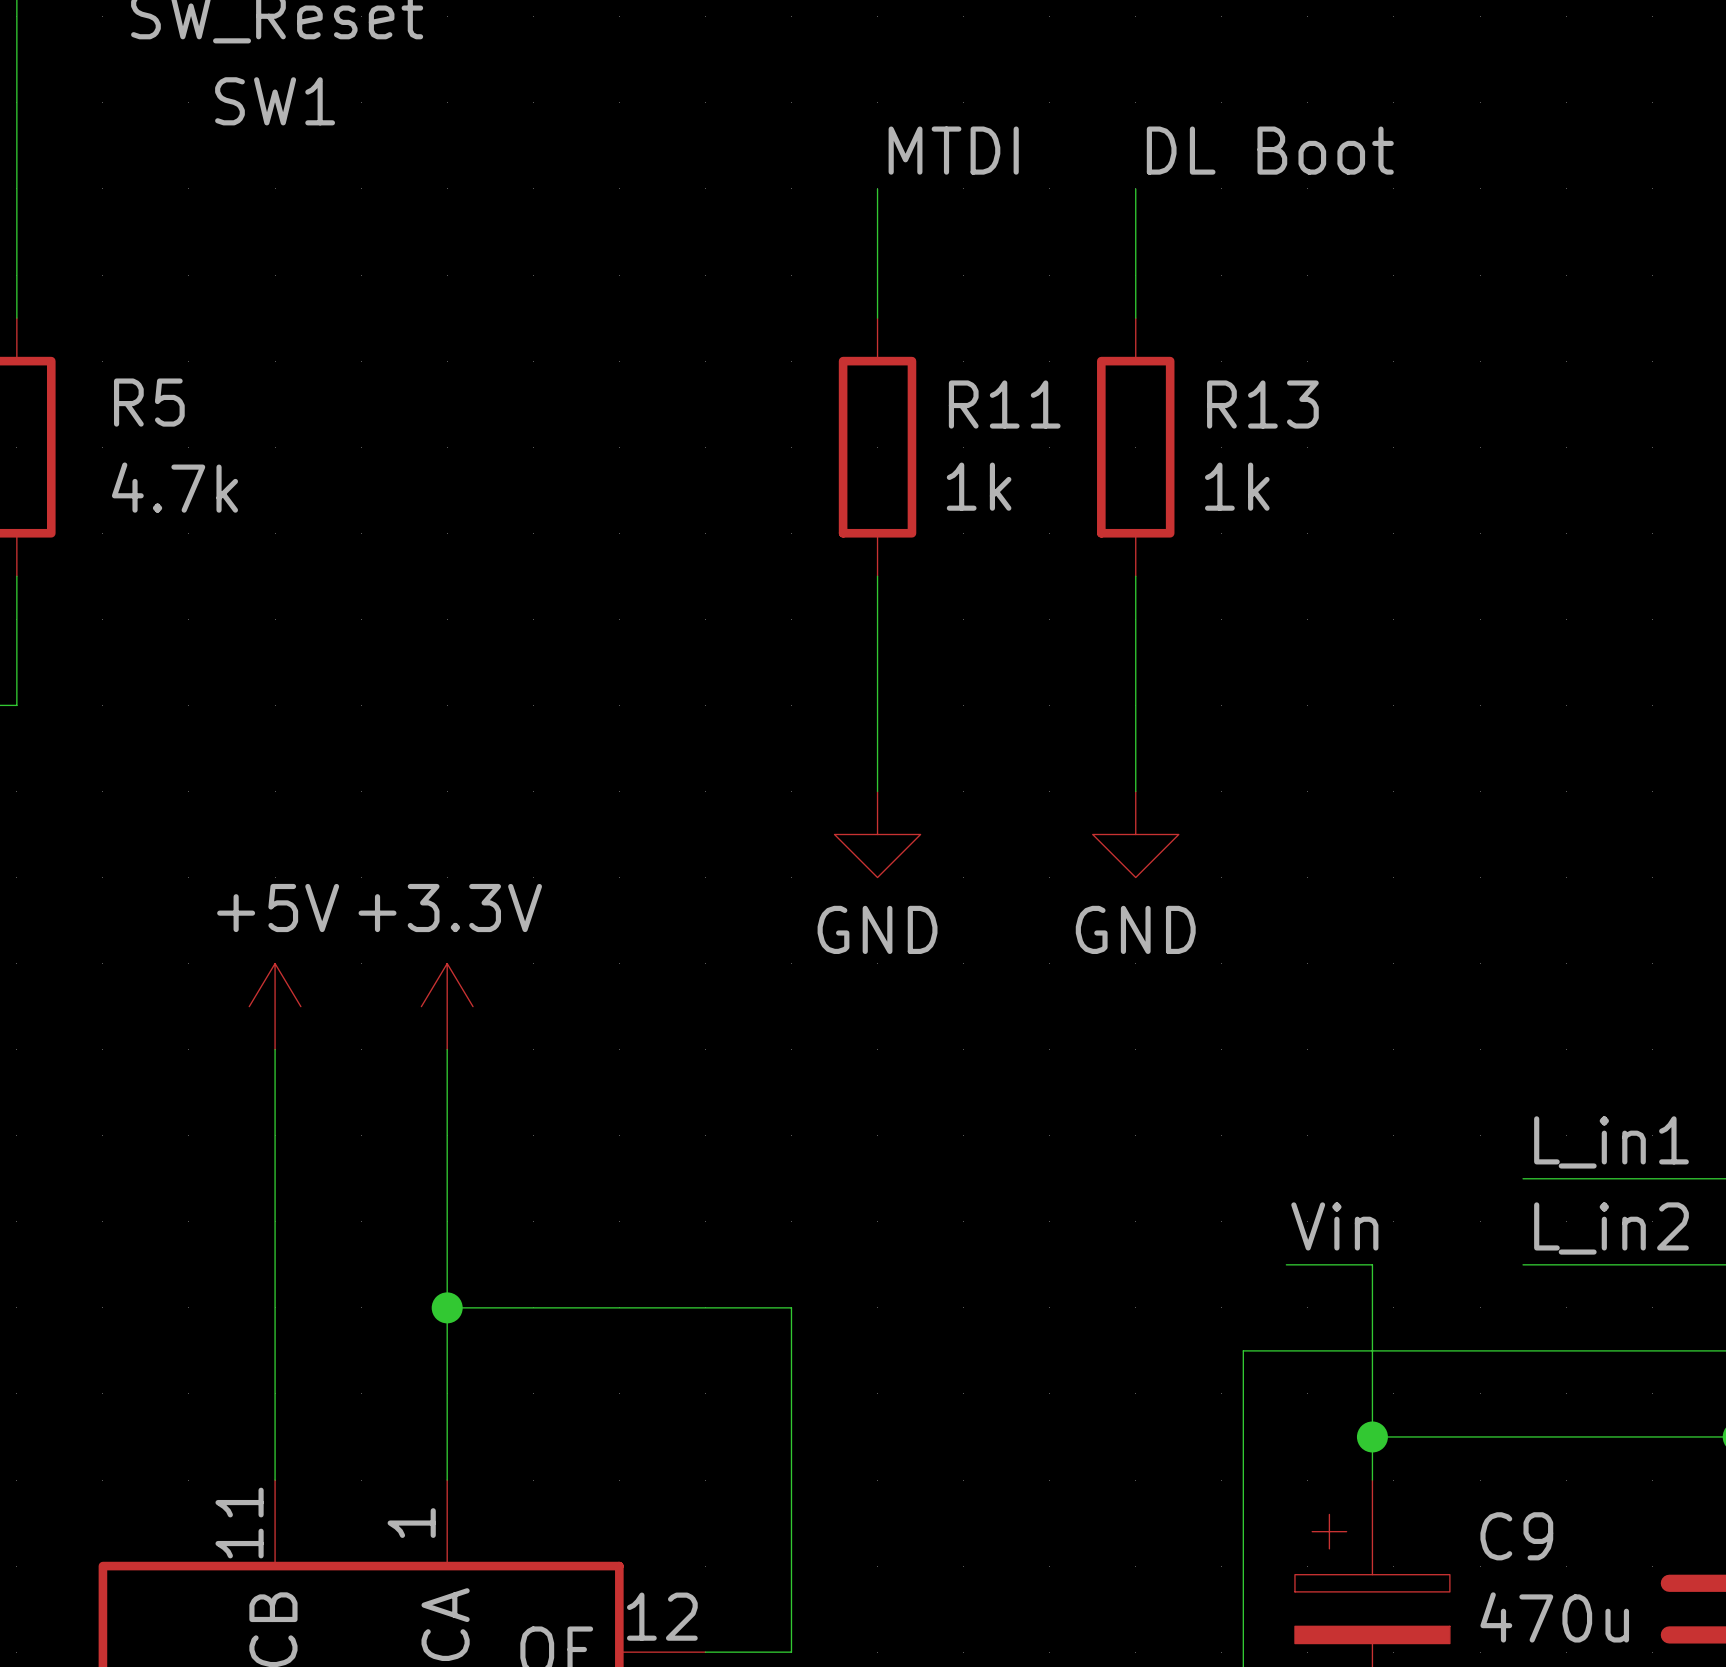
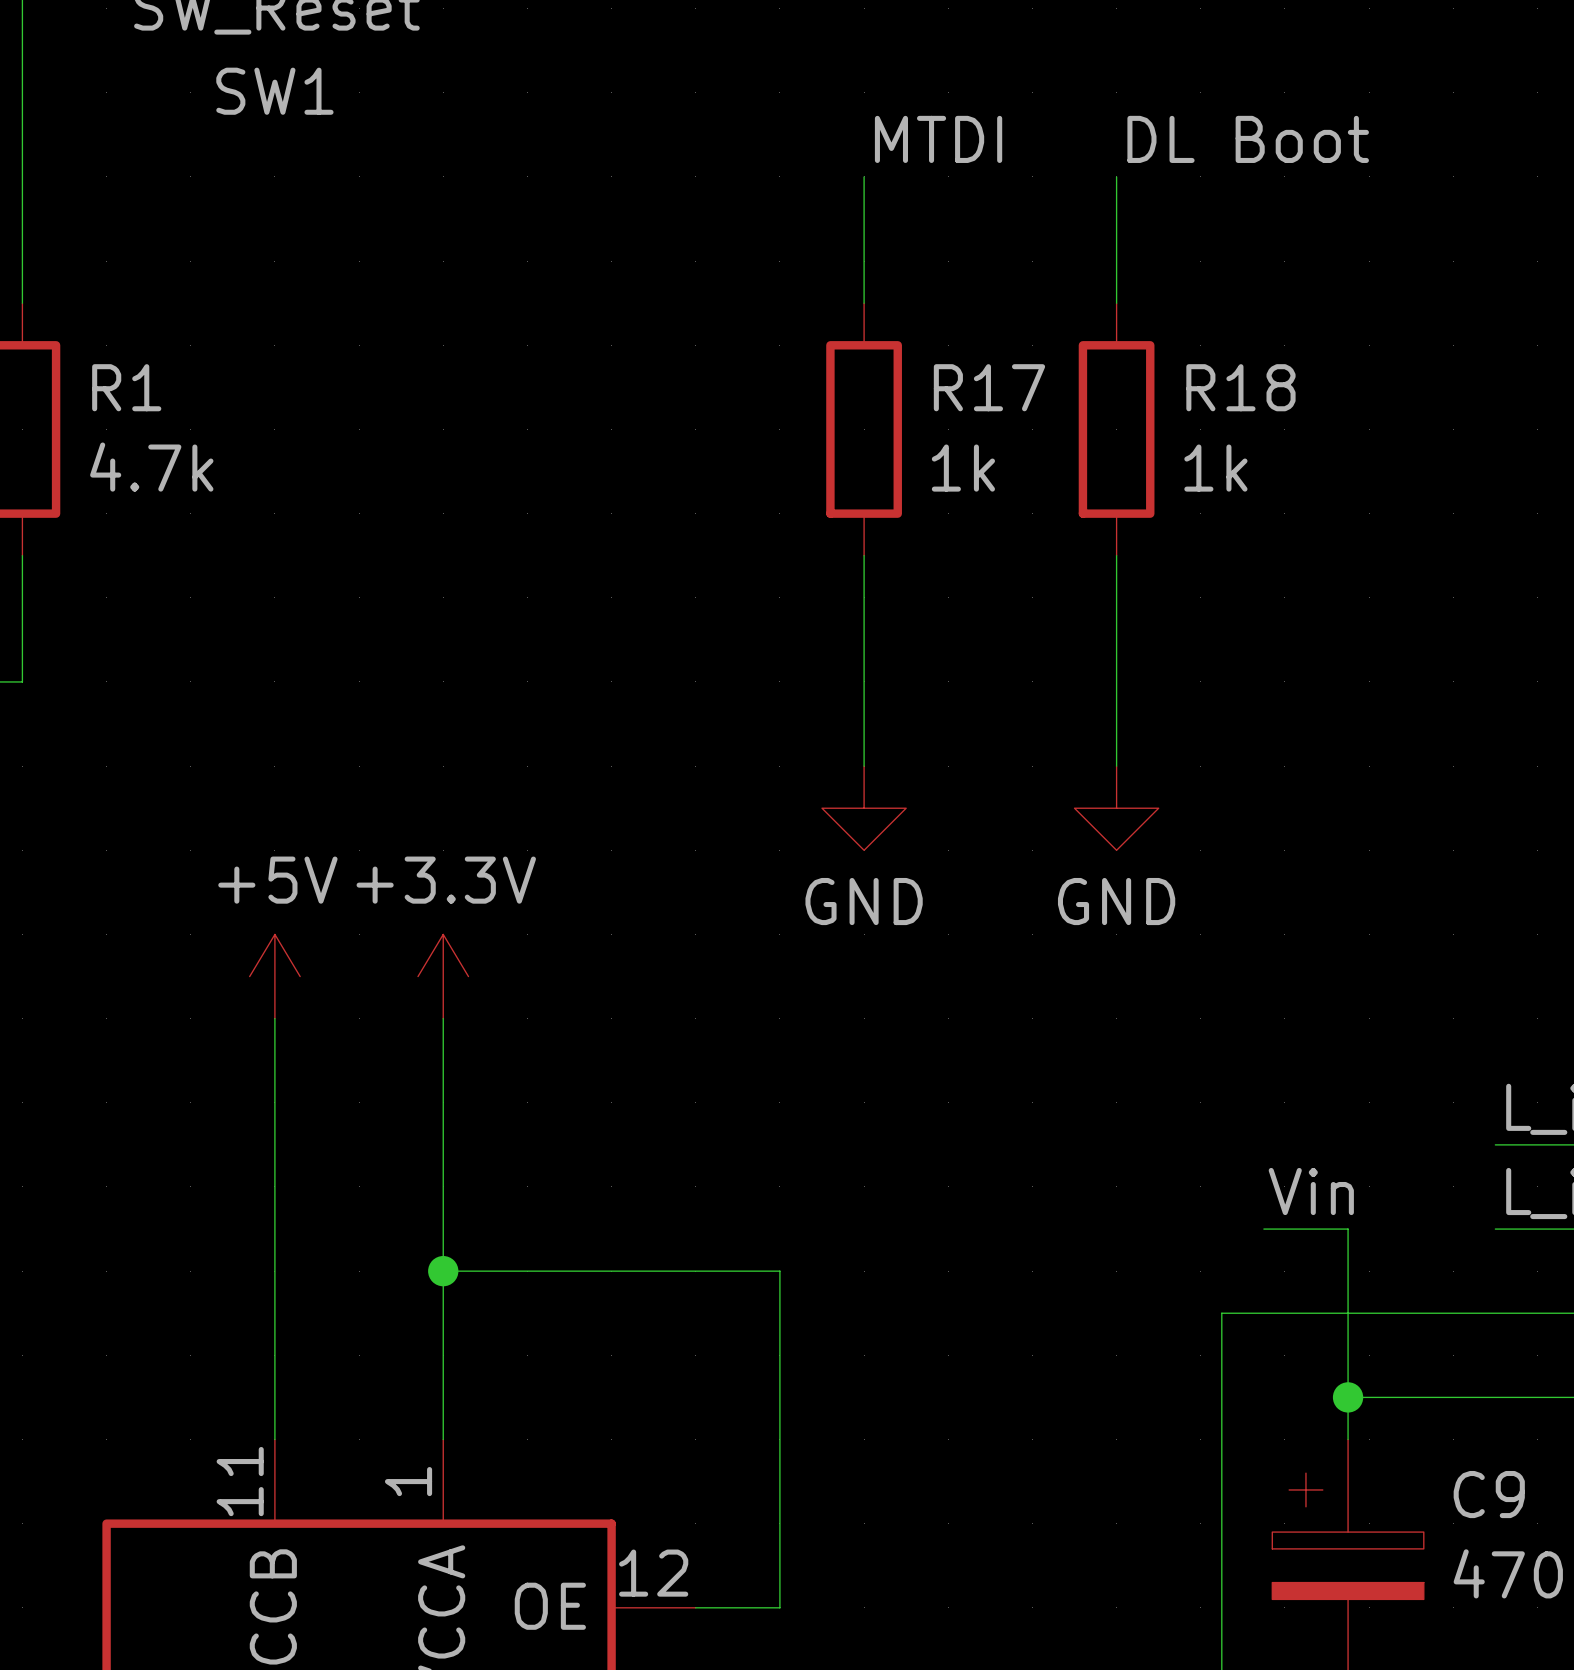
R5 name: R5 (149, 402) -> R1 (126, 387)
R11 name: R11 (1004, 404) -> R17 (989, 387)
R13 name: R13 (1262, 404) -> R18 (1240, 387)
R5 value position: 4.7k (174, 487) -> 4.7k (151, 467)

